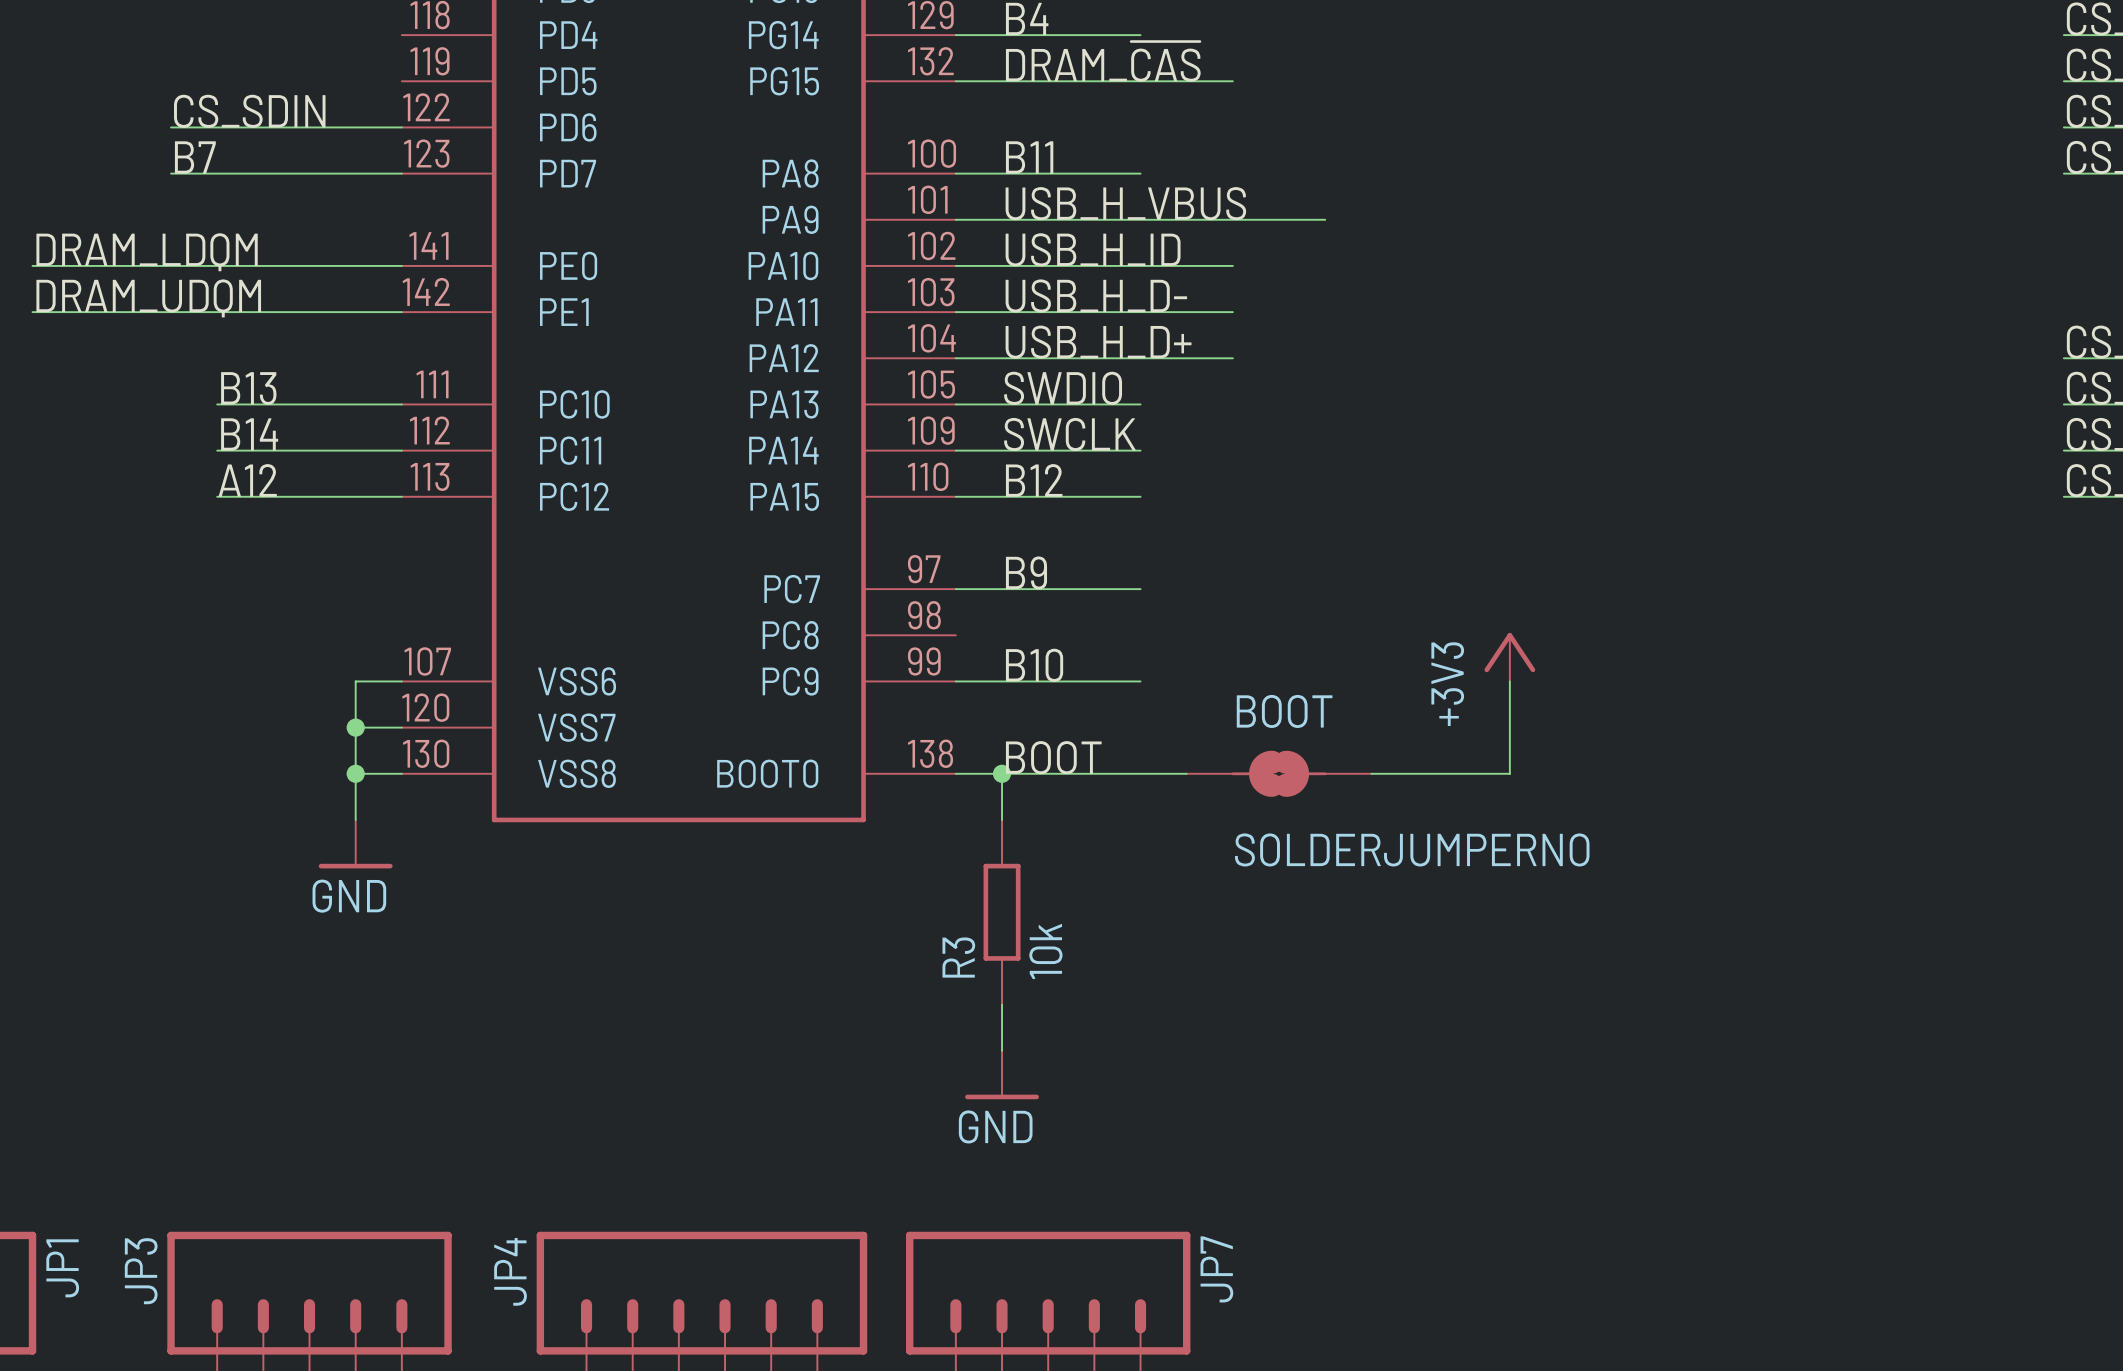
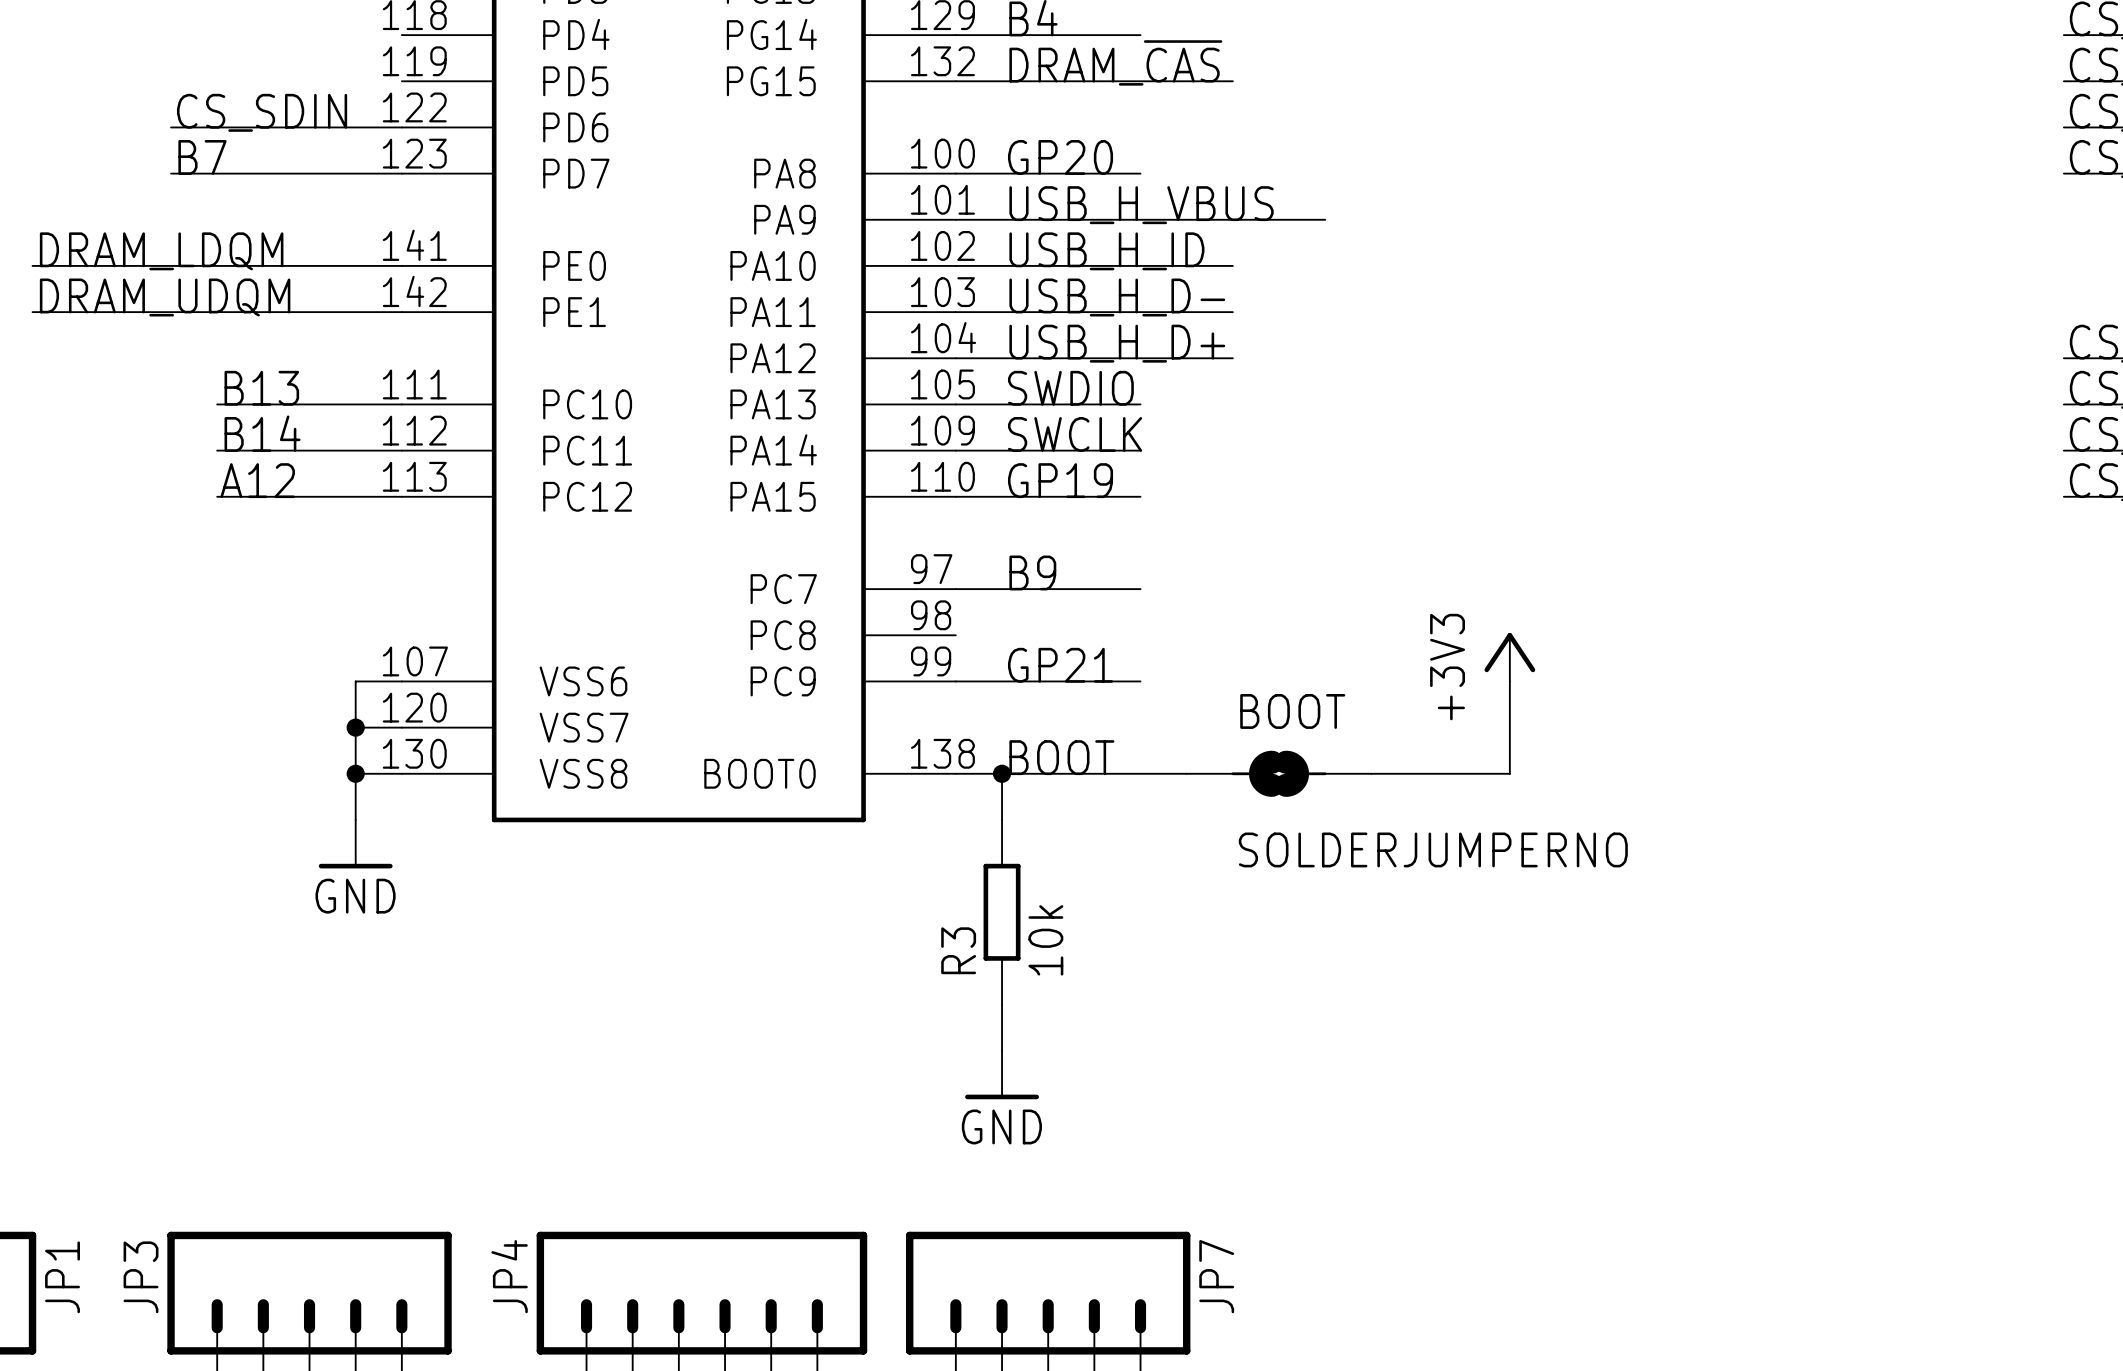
label: B11 (1029, 157) -> GP20 (1060, 157)
label: B12 (1034, 480) -> GP19 (1060, 480)
label: B10 (1034, 665) -> GP21 (1060, 665)

